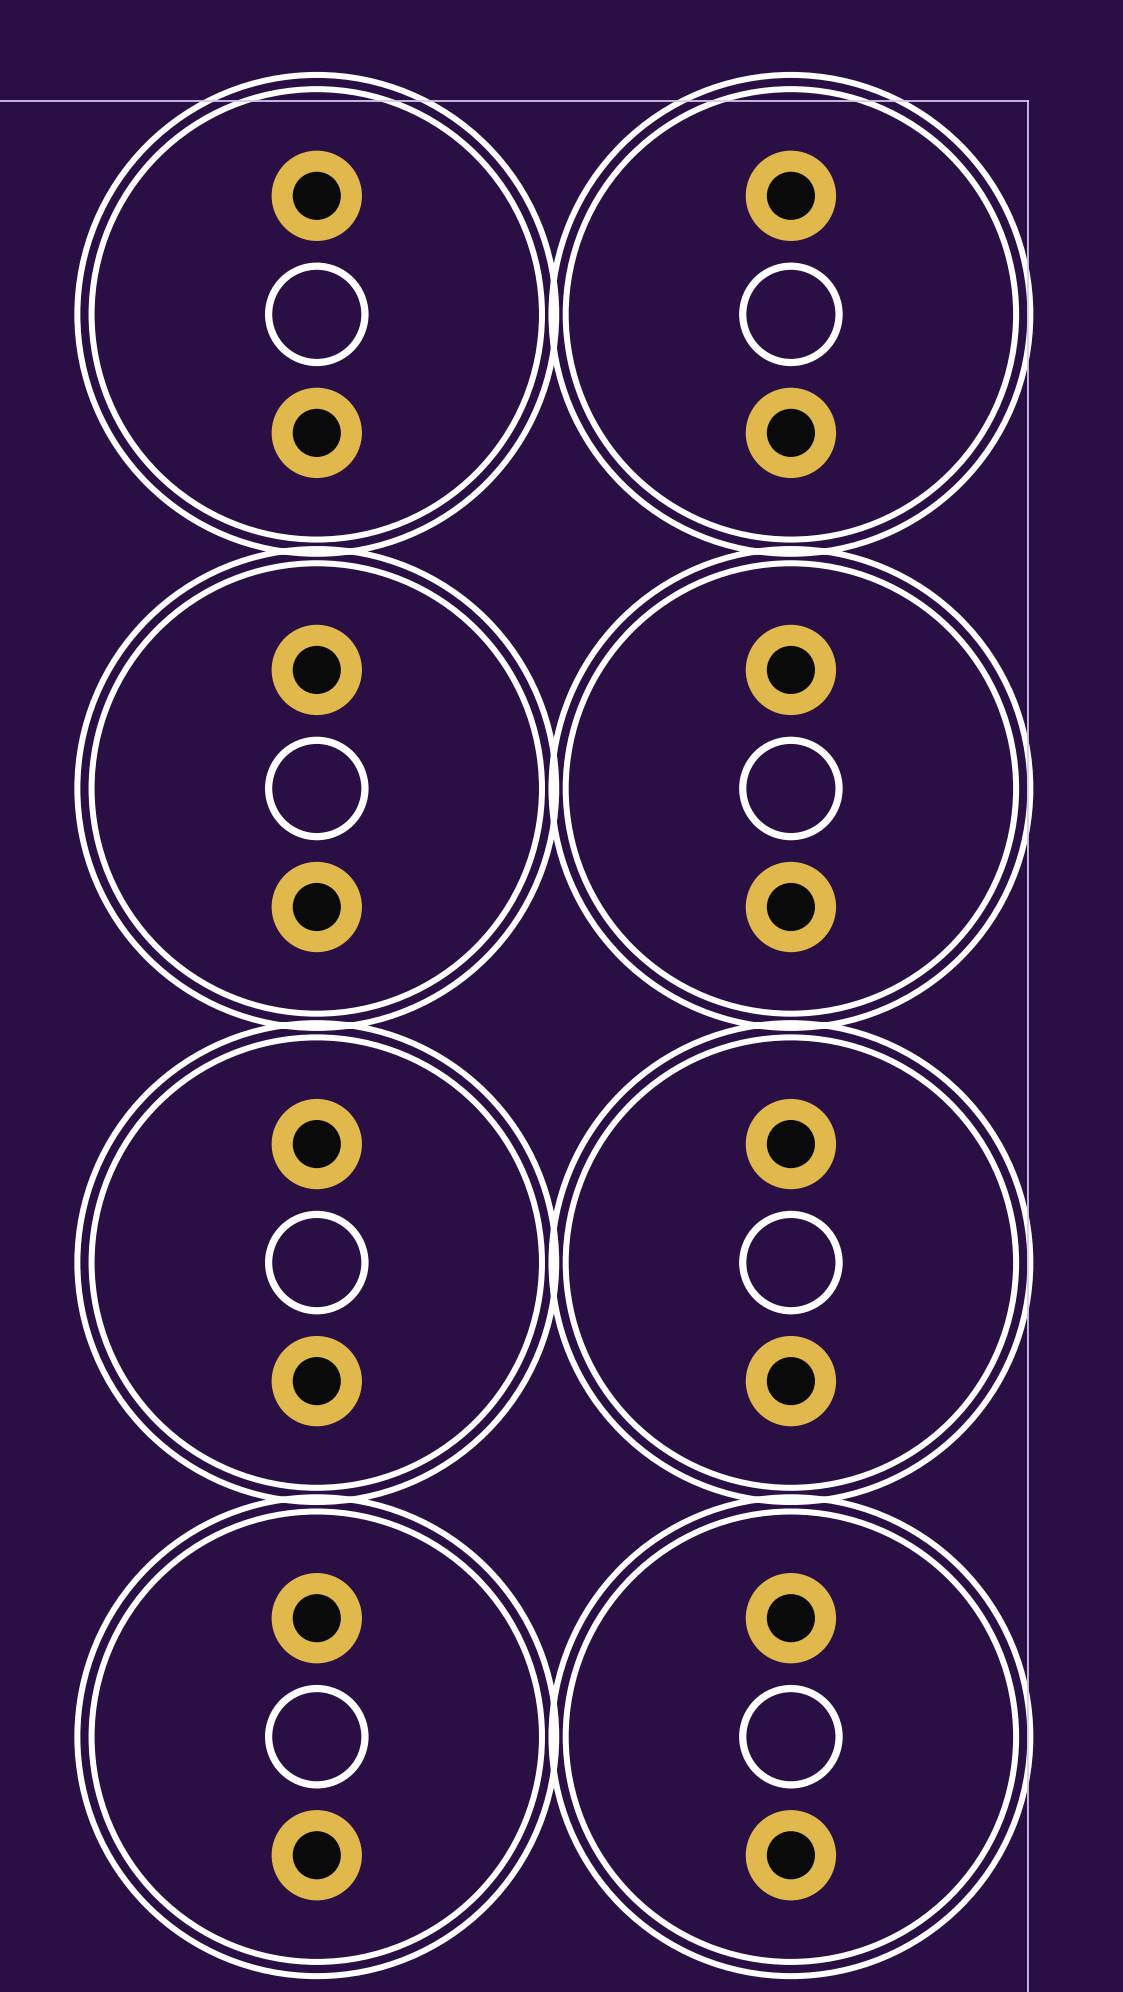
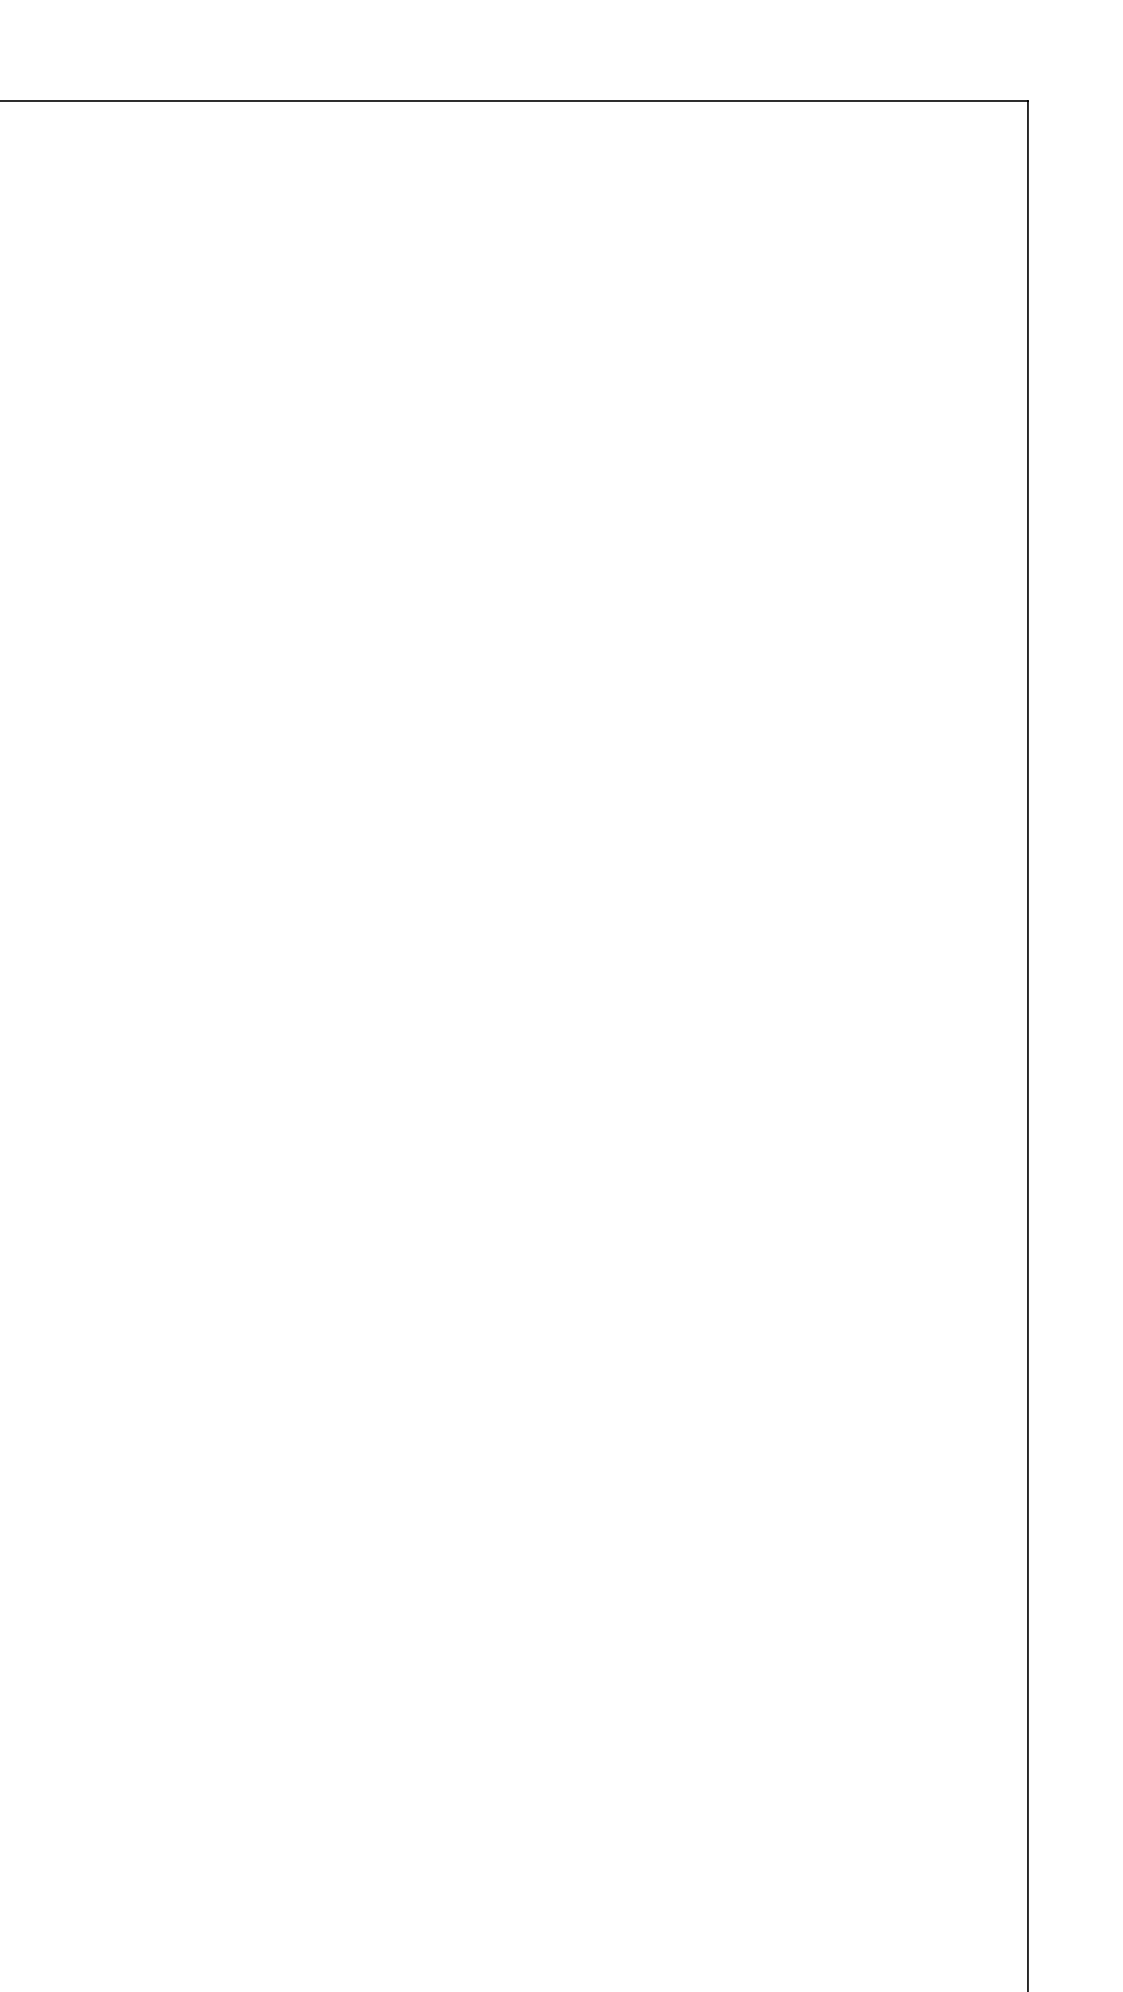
part: (316, 314) -> none
part: (790, 314) -> none
part: (316, 788) -> none
part: (790, 788) -> none
part: (316, 1262) -> none
part: (790, 1262) -> none
part: (316, 1736) -> none
part: (790, 1736) -> none

